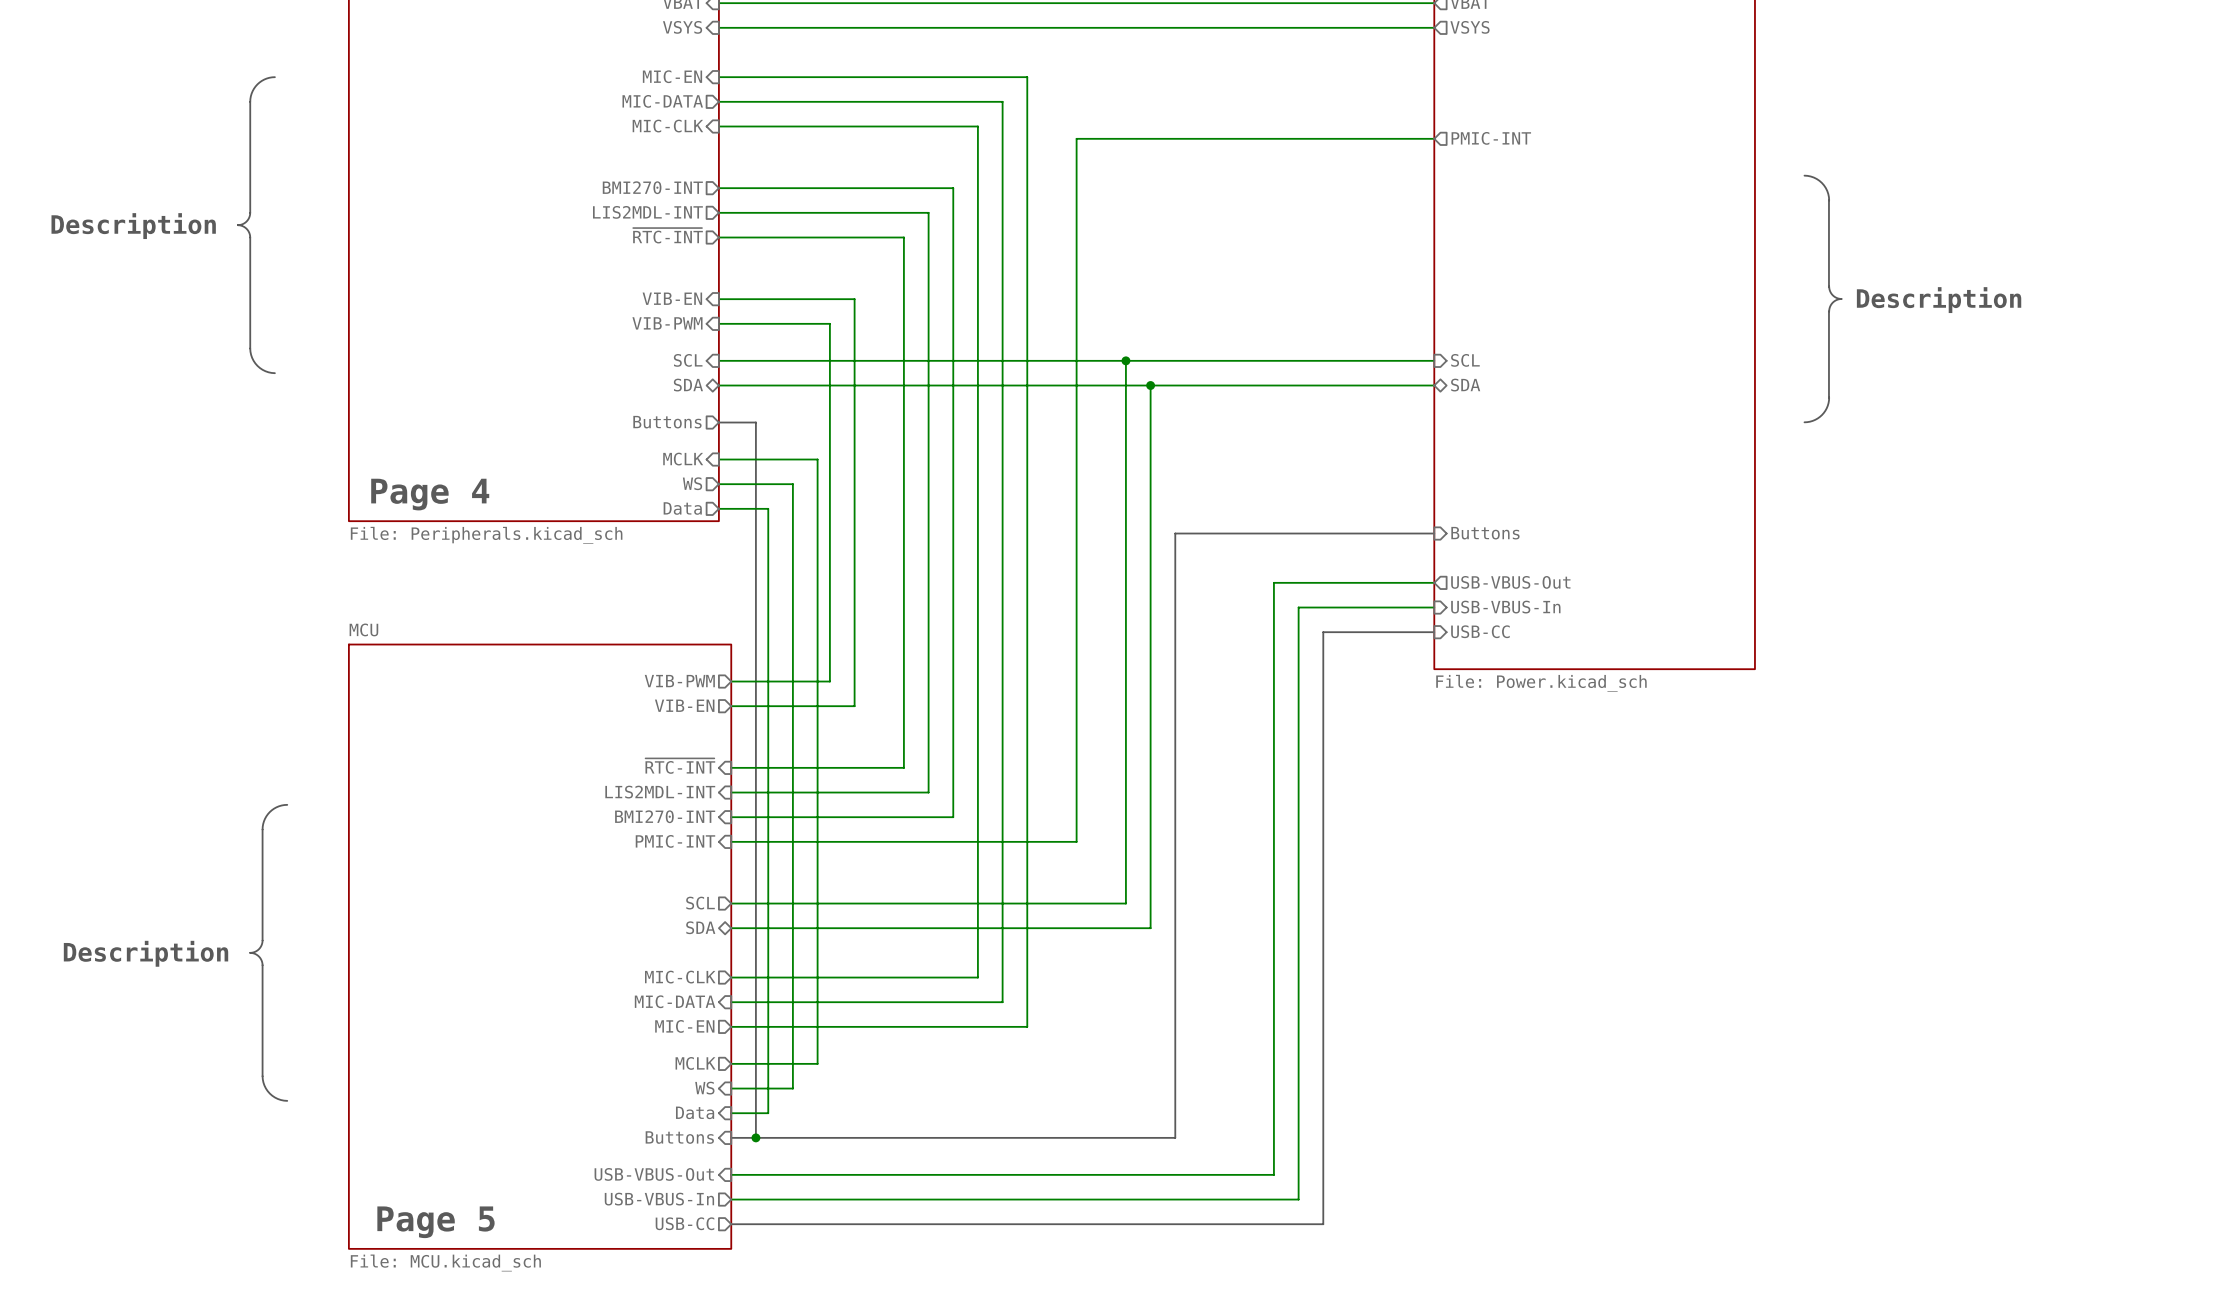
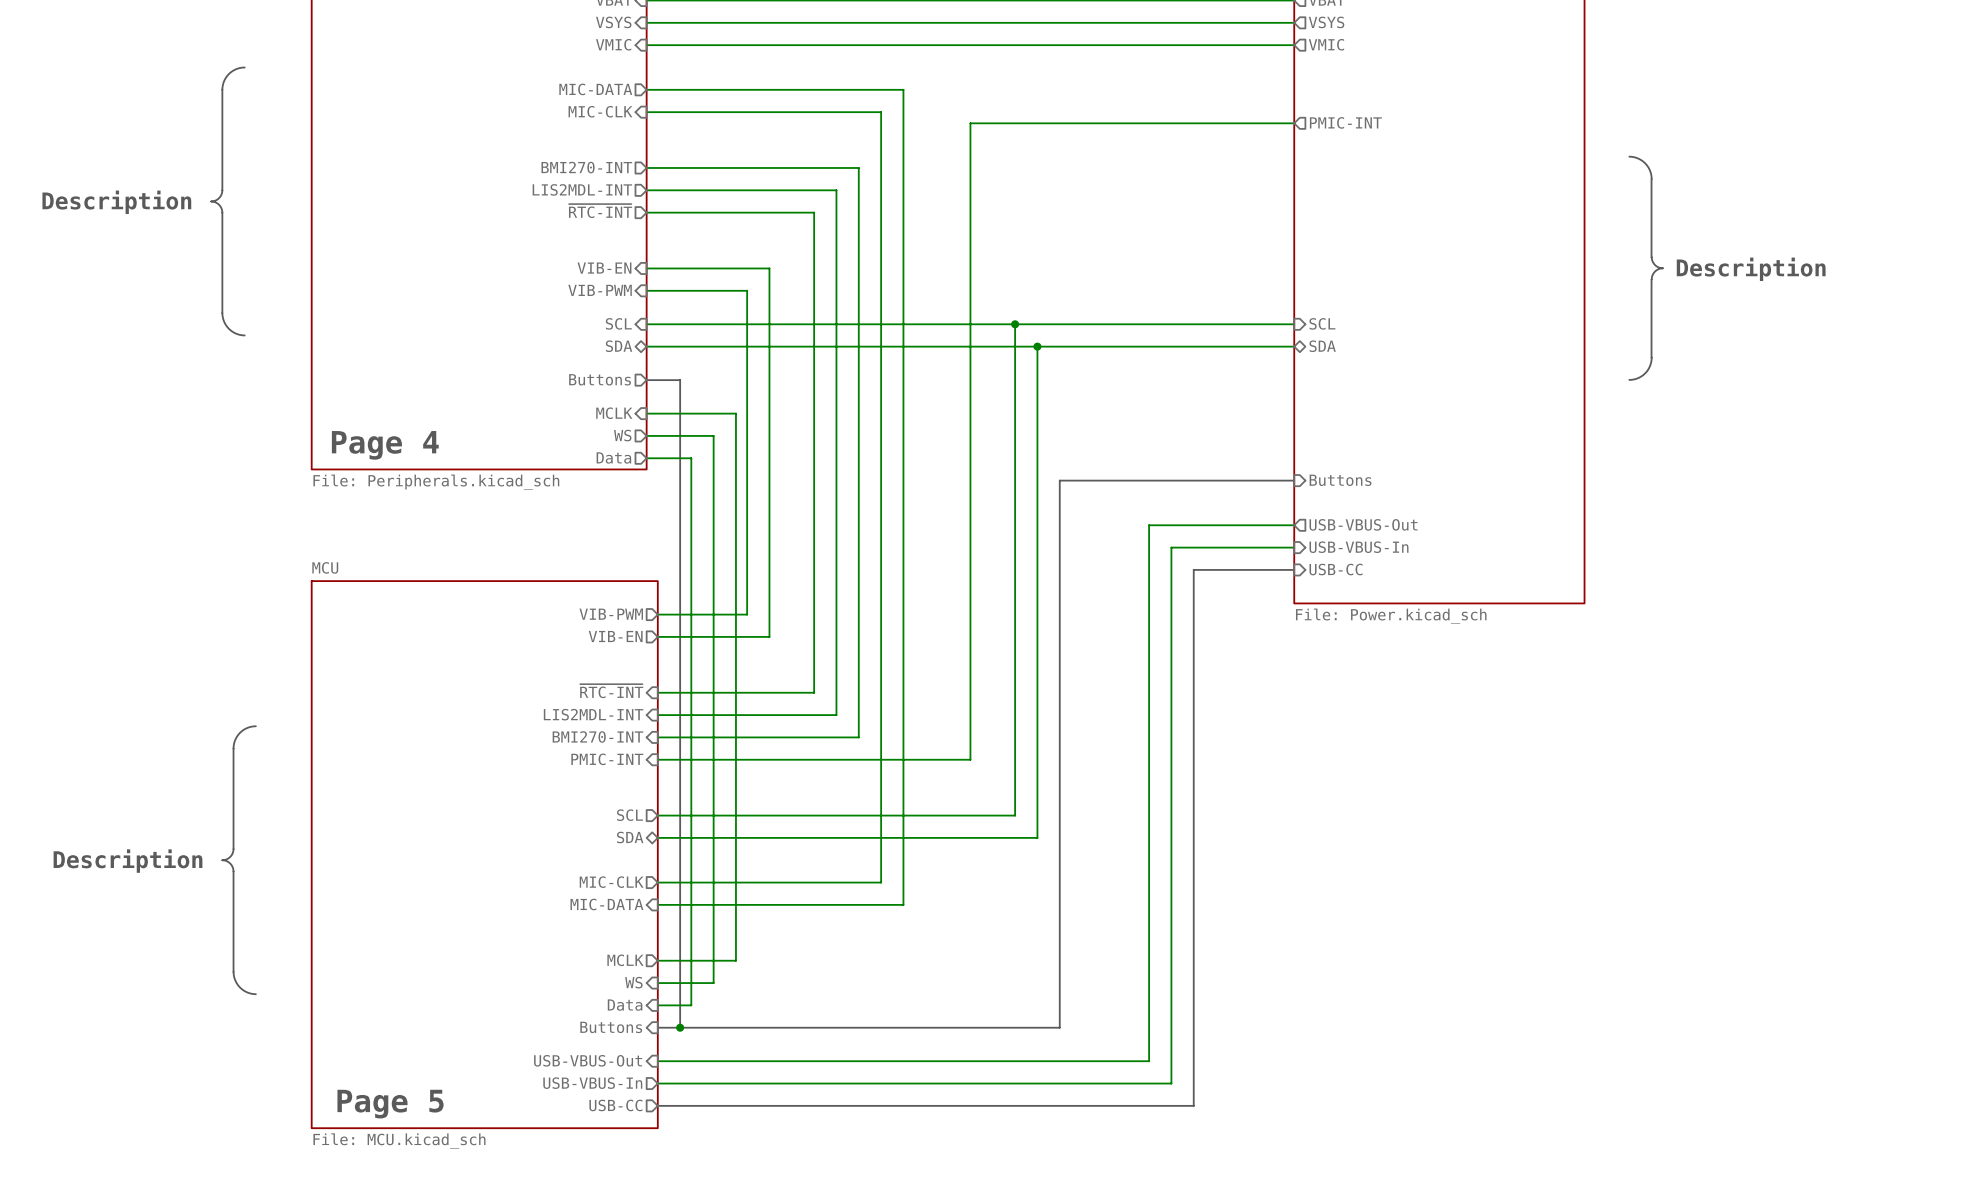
sheet pin: none -> VMIC (613, 44)
wire: none -> (646, 45) (1294, 45)
sheet pin: none -> VMIC (1326, 44)
sheet pin: MIC-EN (672, 76) -> none
wire: (718, 77) (1027, 77) (1027, 1026) (731, 1026) -> none
sheet pin: MIC-EN (684, 1026) -> none

